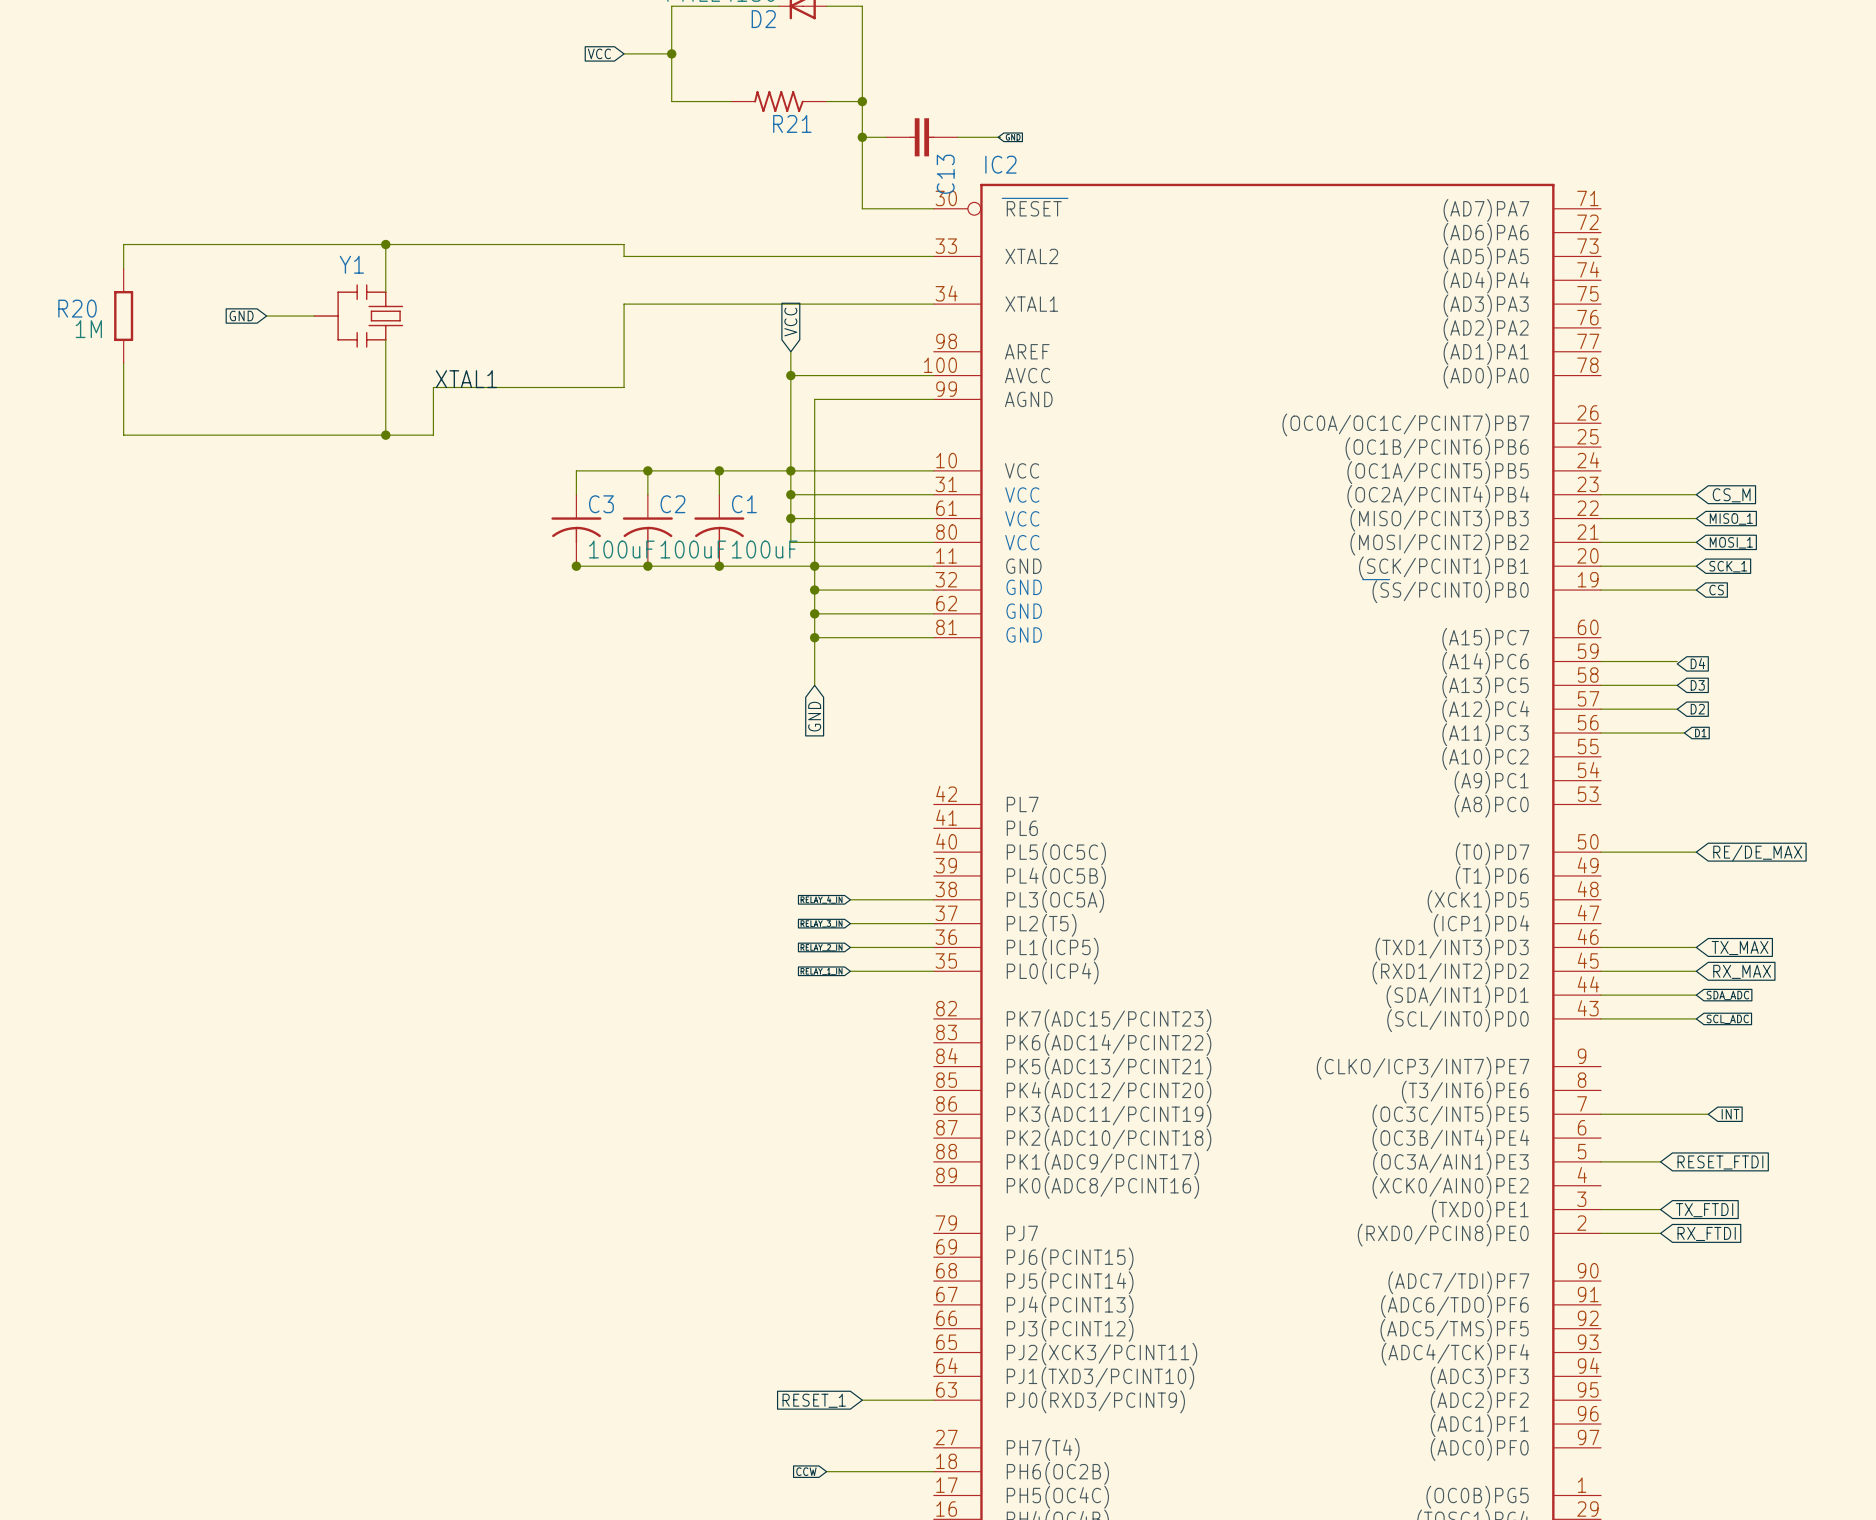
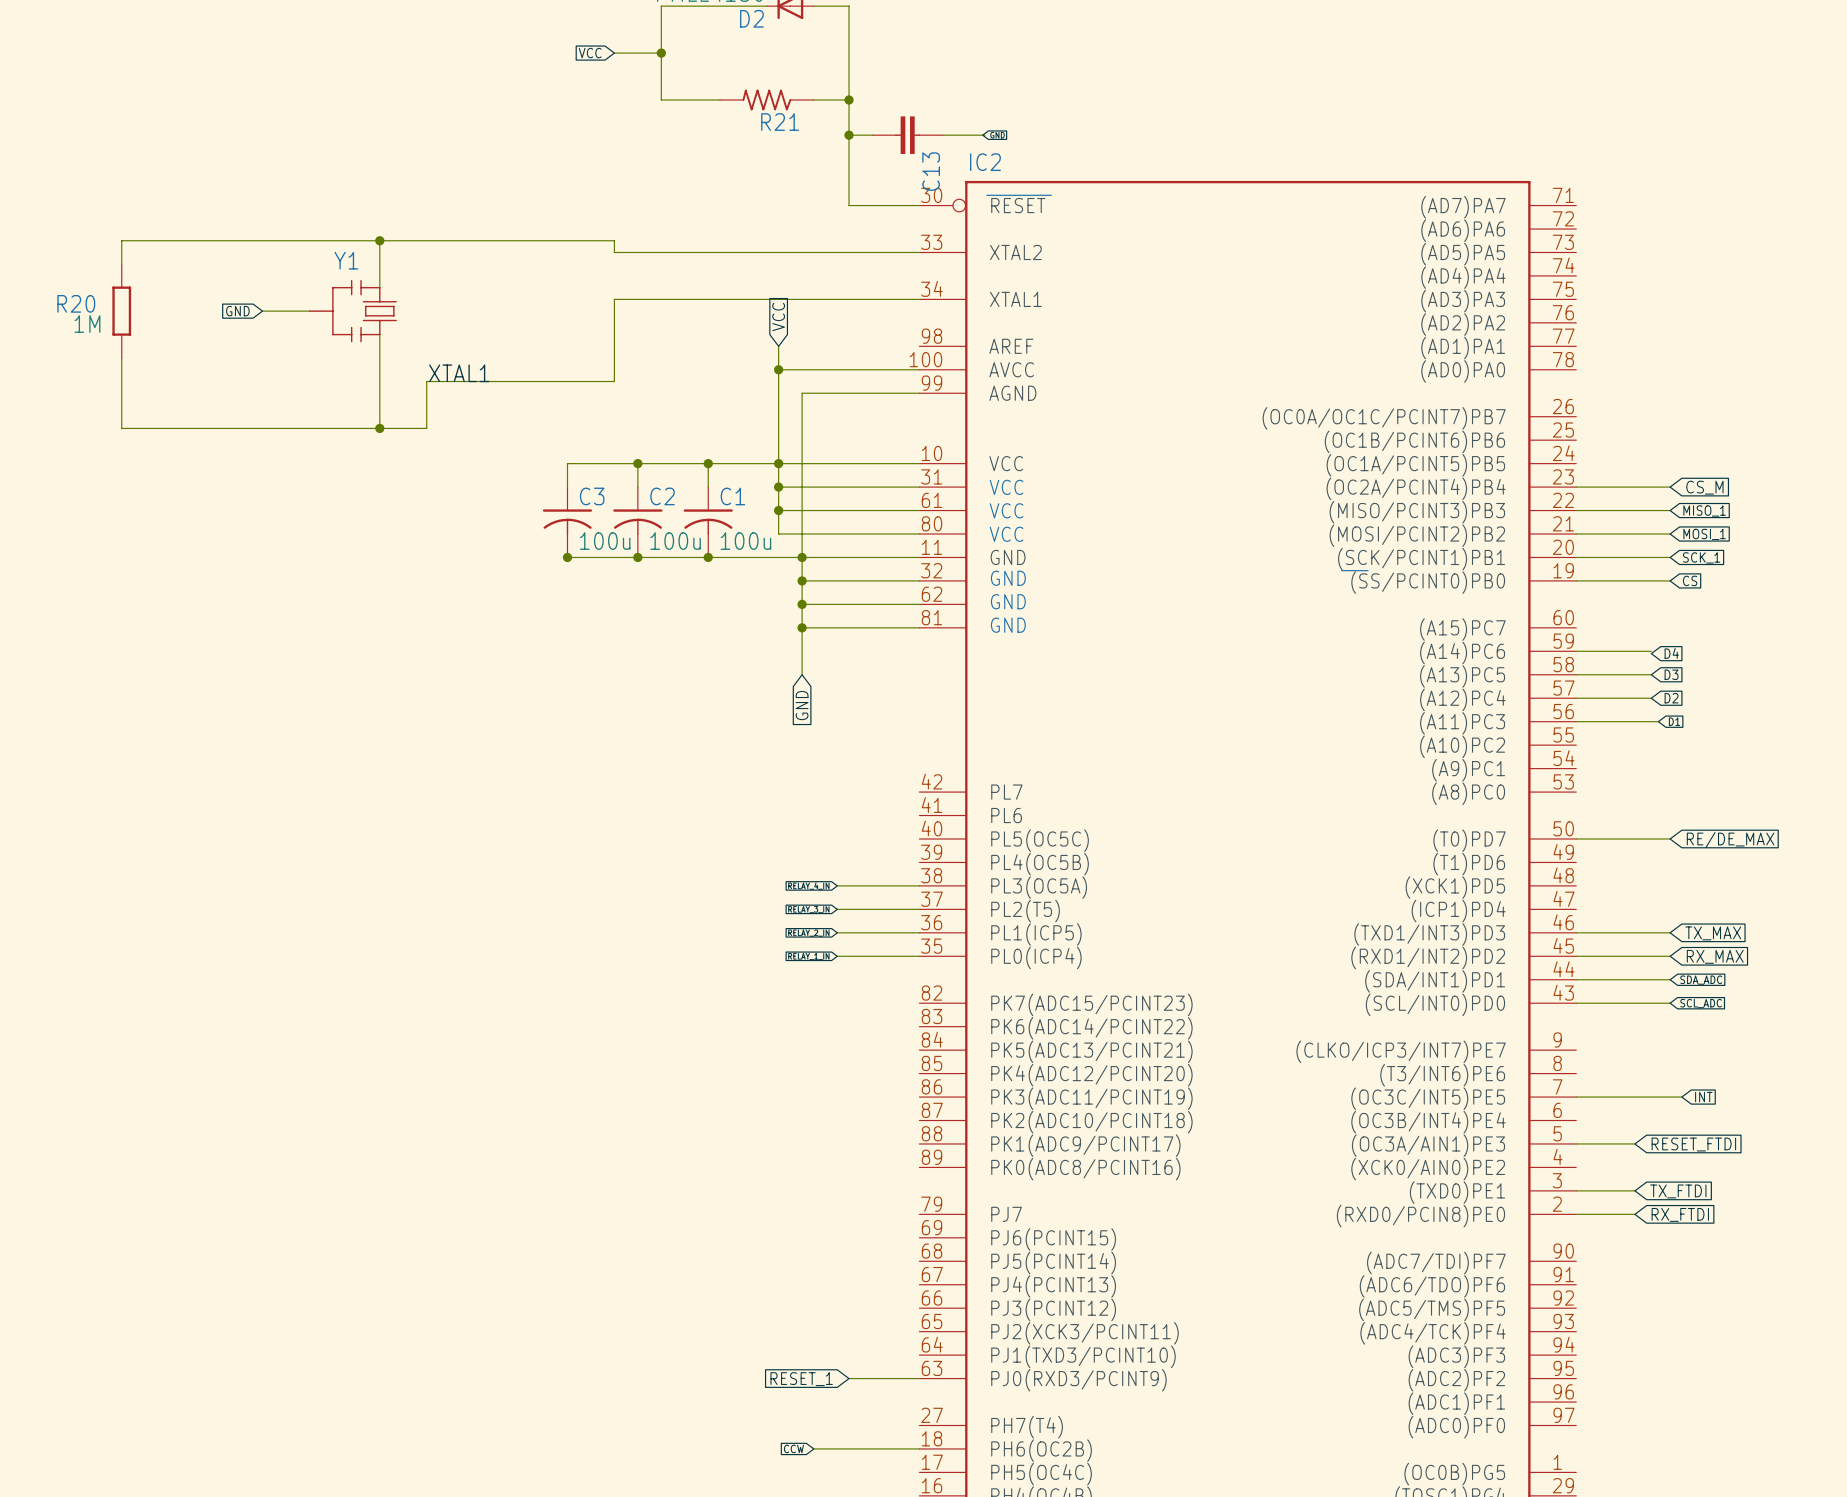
C3 value: 100uF (621, 549) -> 100u (605, 541)
C2 value: 100uF (693, 549) -> 100u (675, 541)
C1 value: 100uF (764, 549) -> 100u (745, 541)

